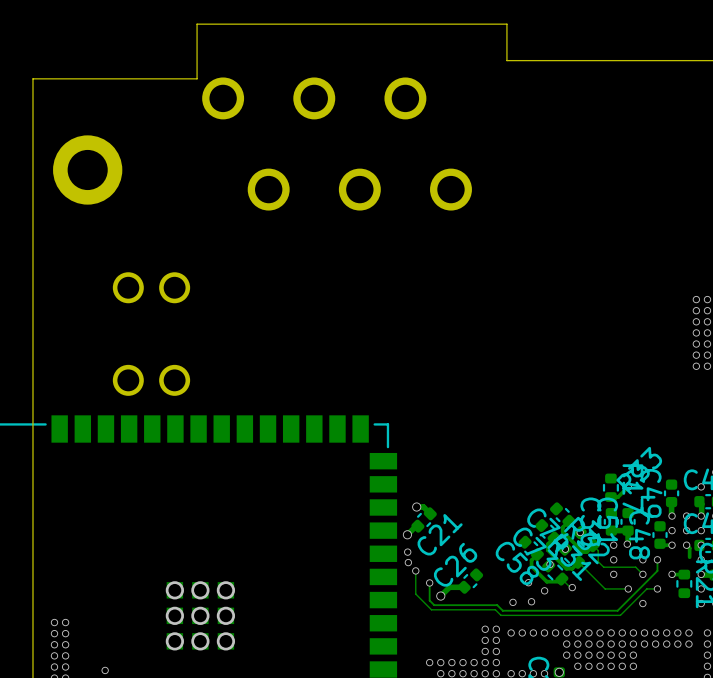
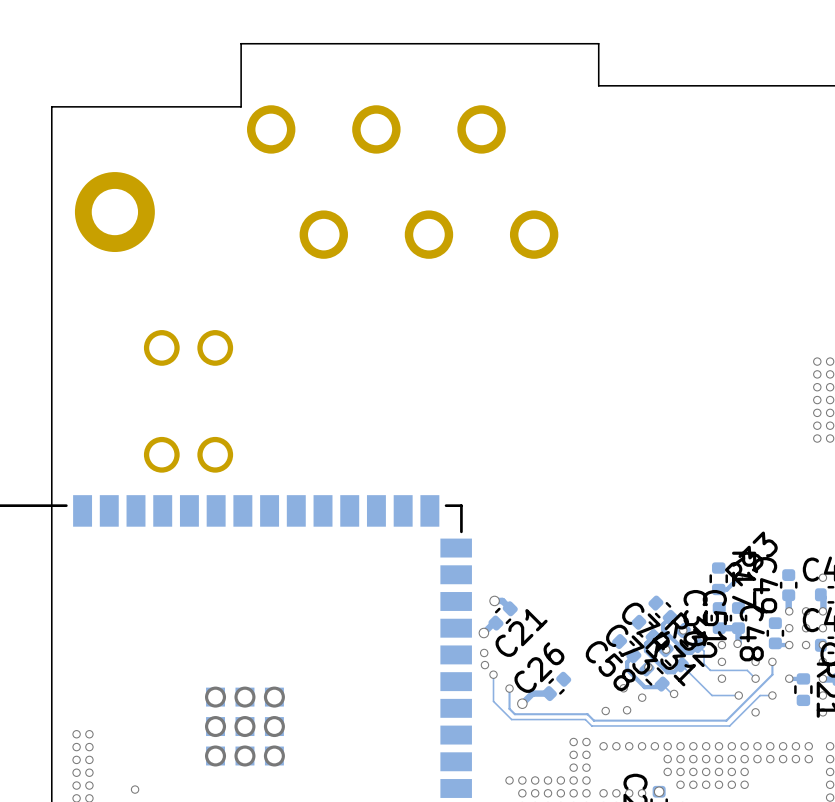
track: (686, 545) (689, 548) (689, 557) -> none

